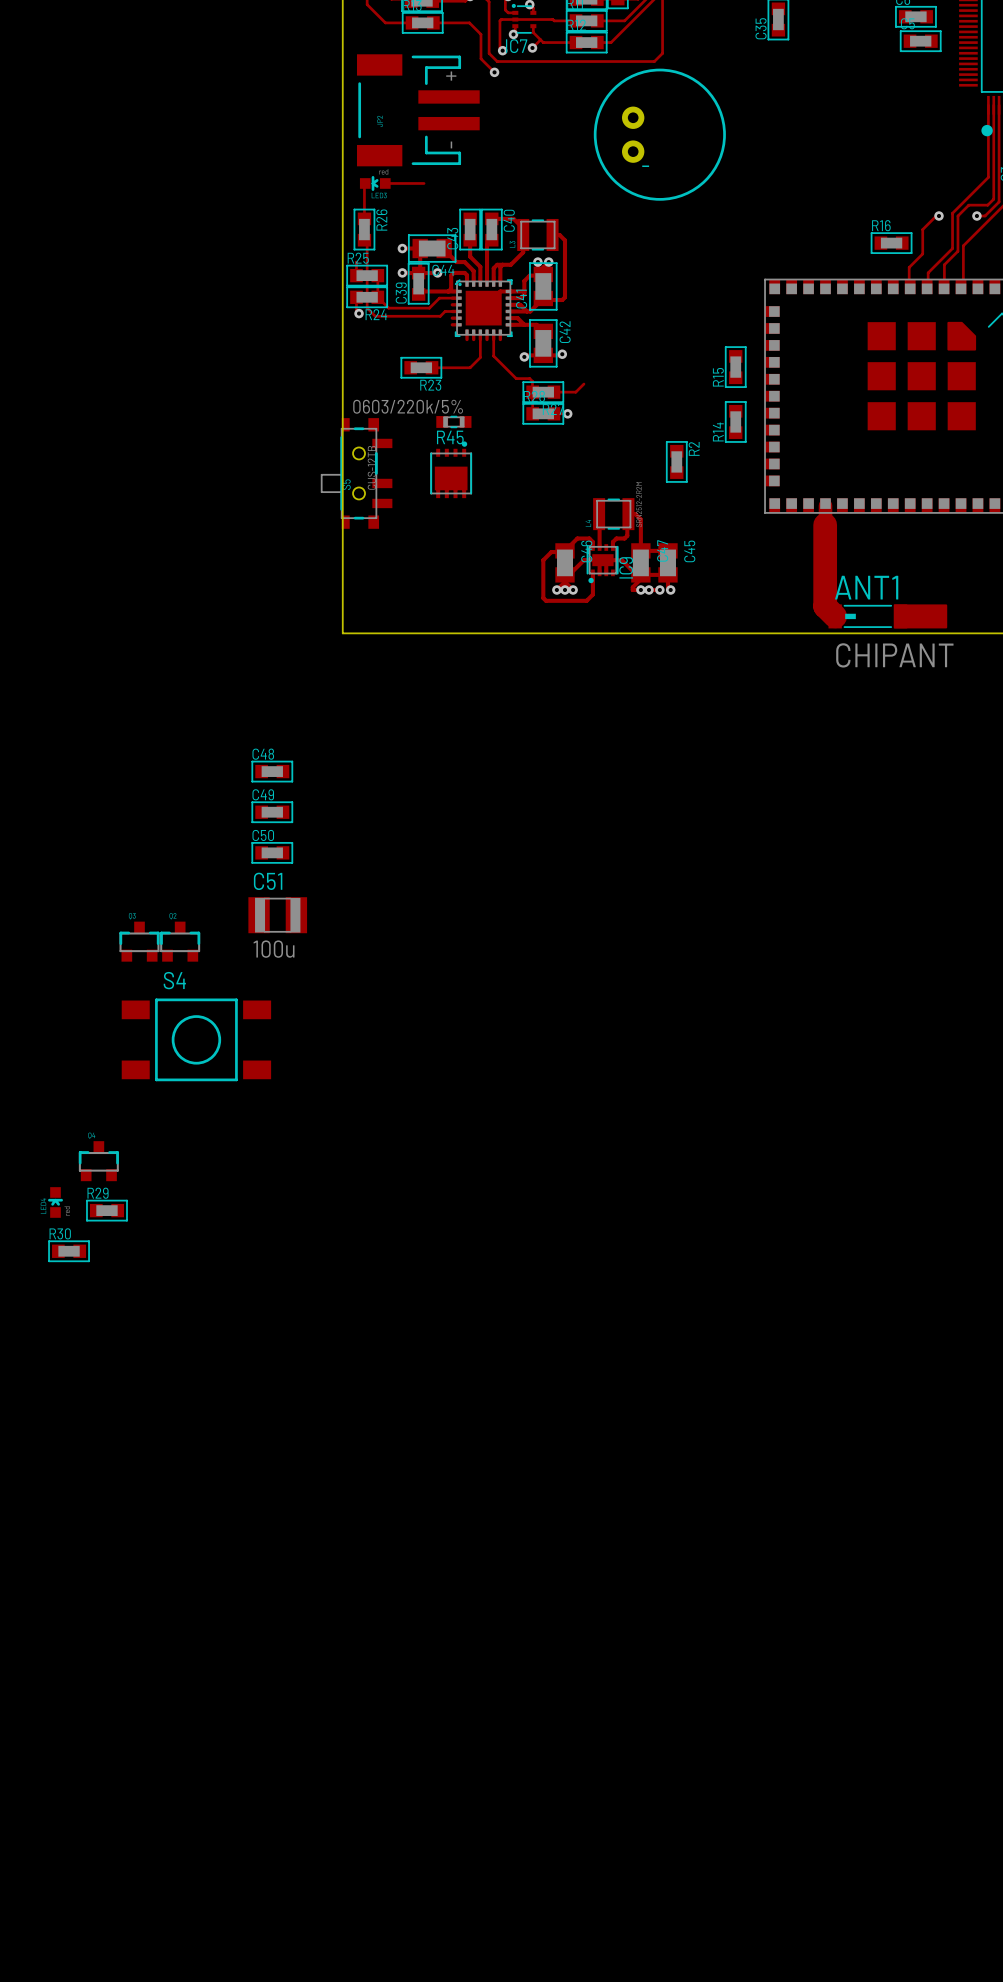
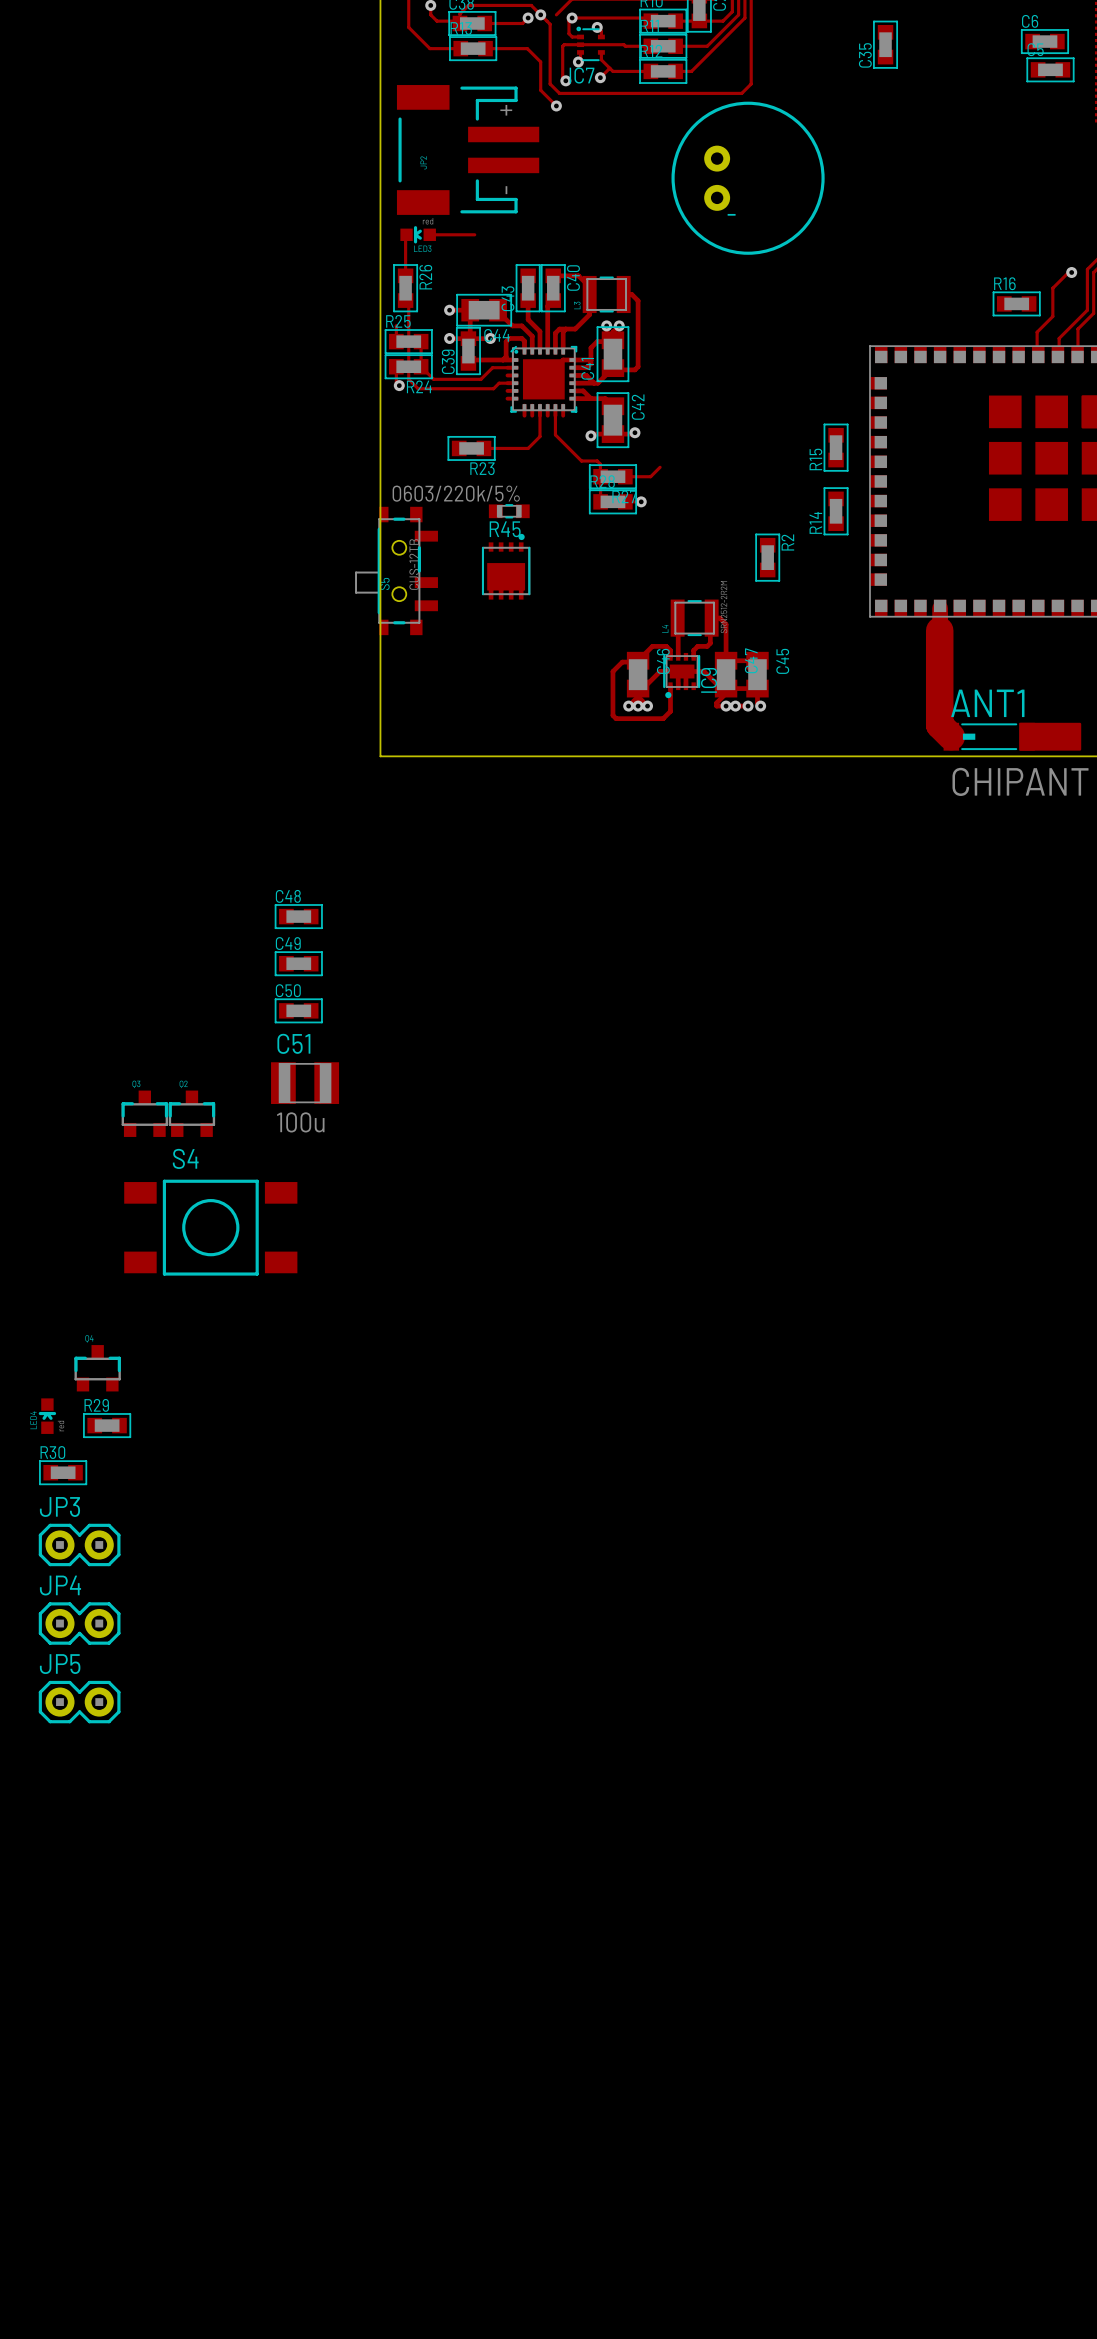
JP3: none -> (79, 1544)
JP4: none -> (79, 1623)
JP5: none -> (79, 1702)

